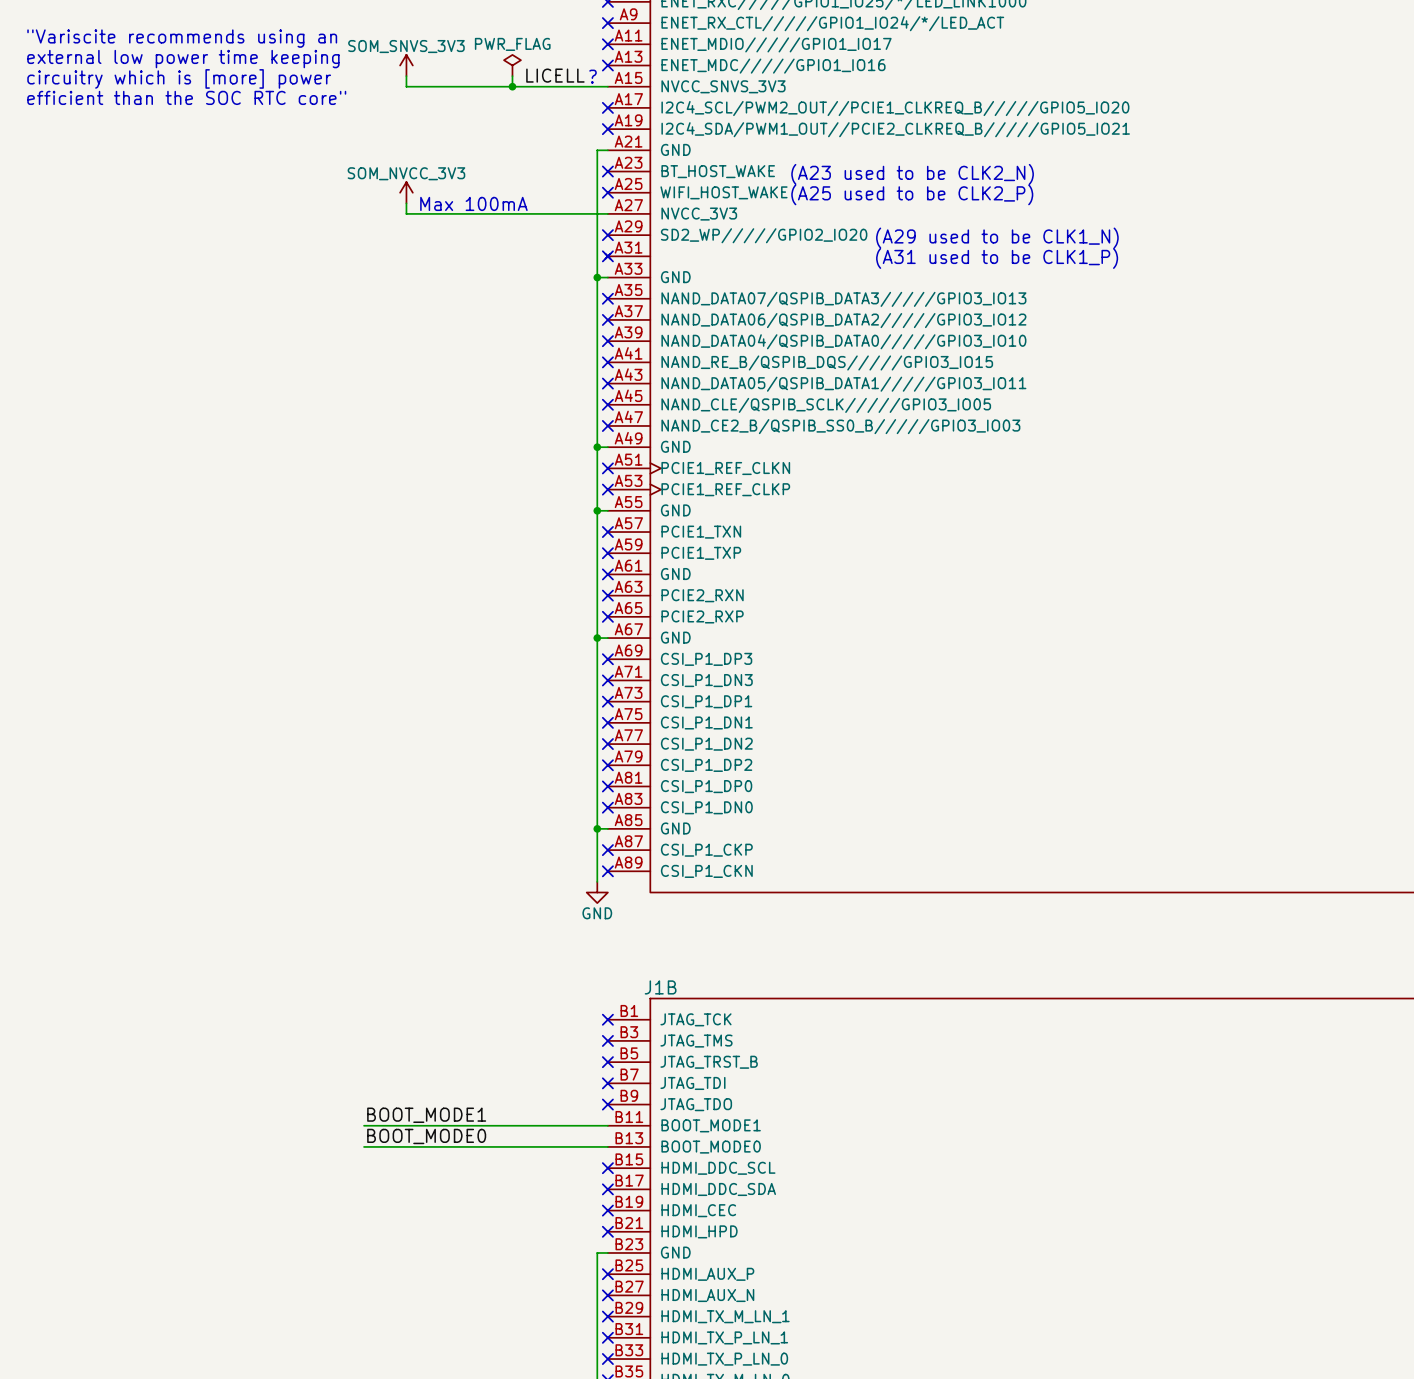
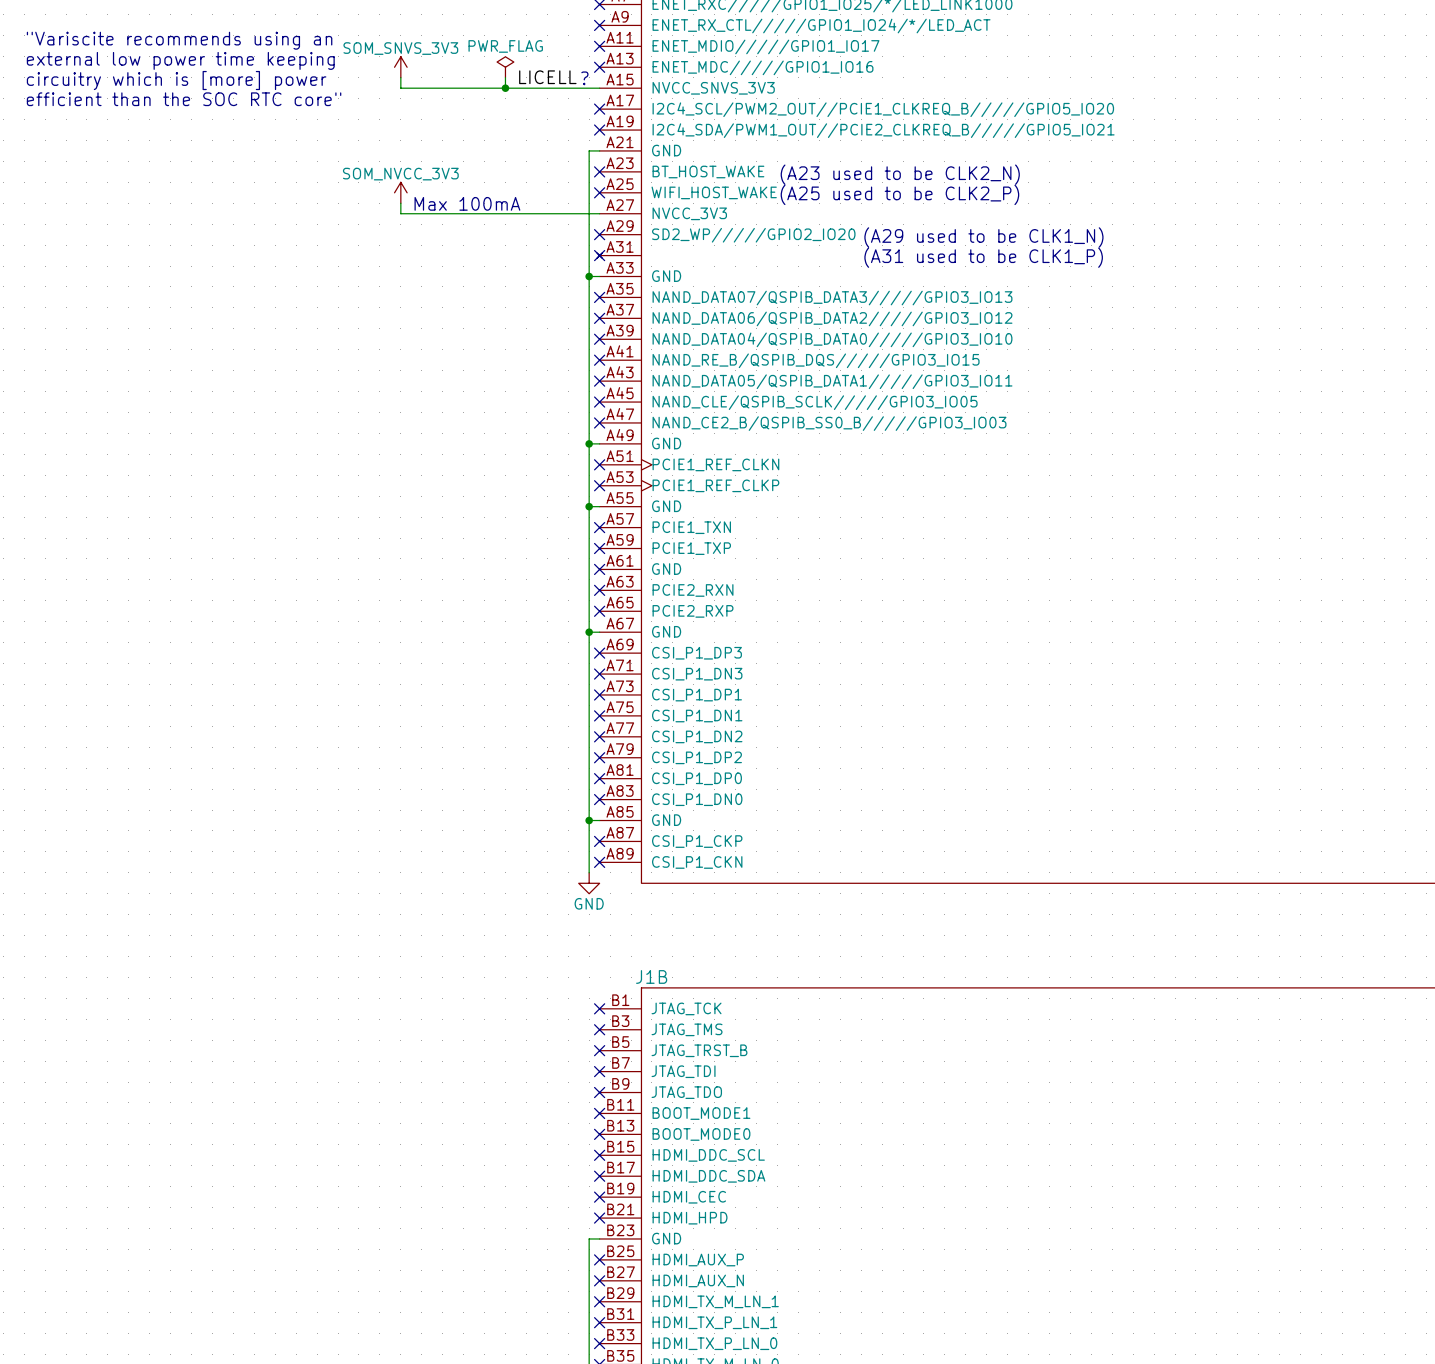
label: BOOT_MODE1 (426, 1115) -> none
wire: (364, 1125) (607, 1125) -> none
no-connect mark: none -> (599, 1113)
label: BOOT_MODE0 (426, 1136) -> none
wire: (364, 1146) (607, 1146) -> none
no-connect mark: none -> (599, 1134)

